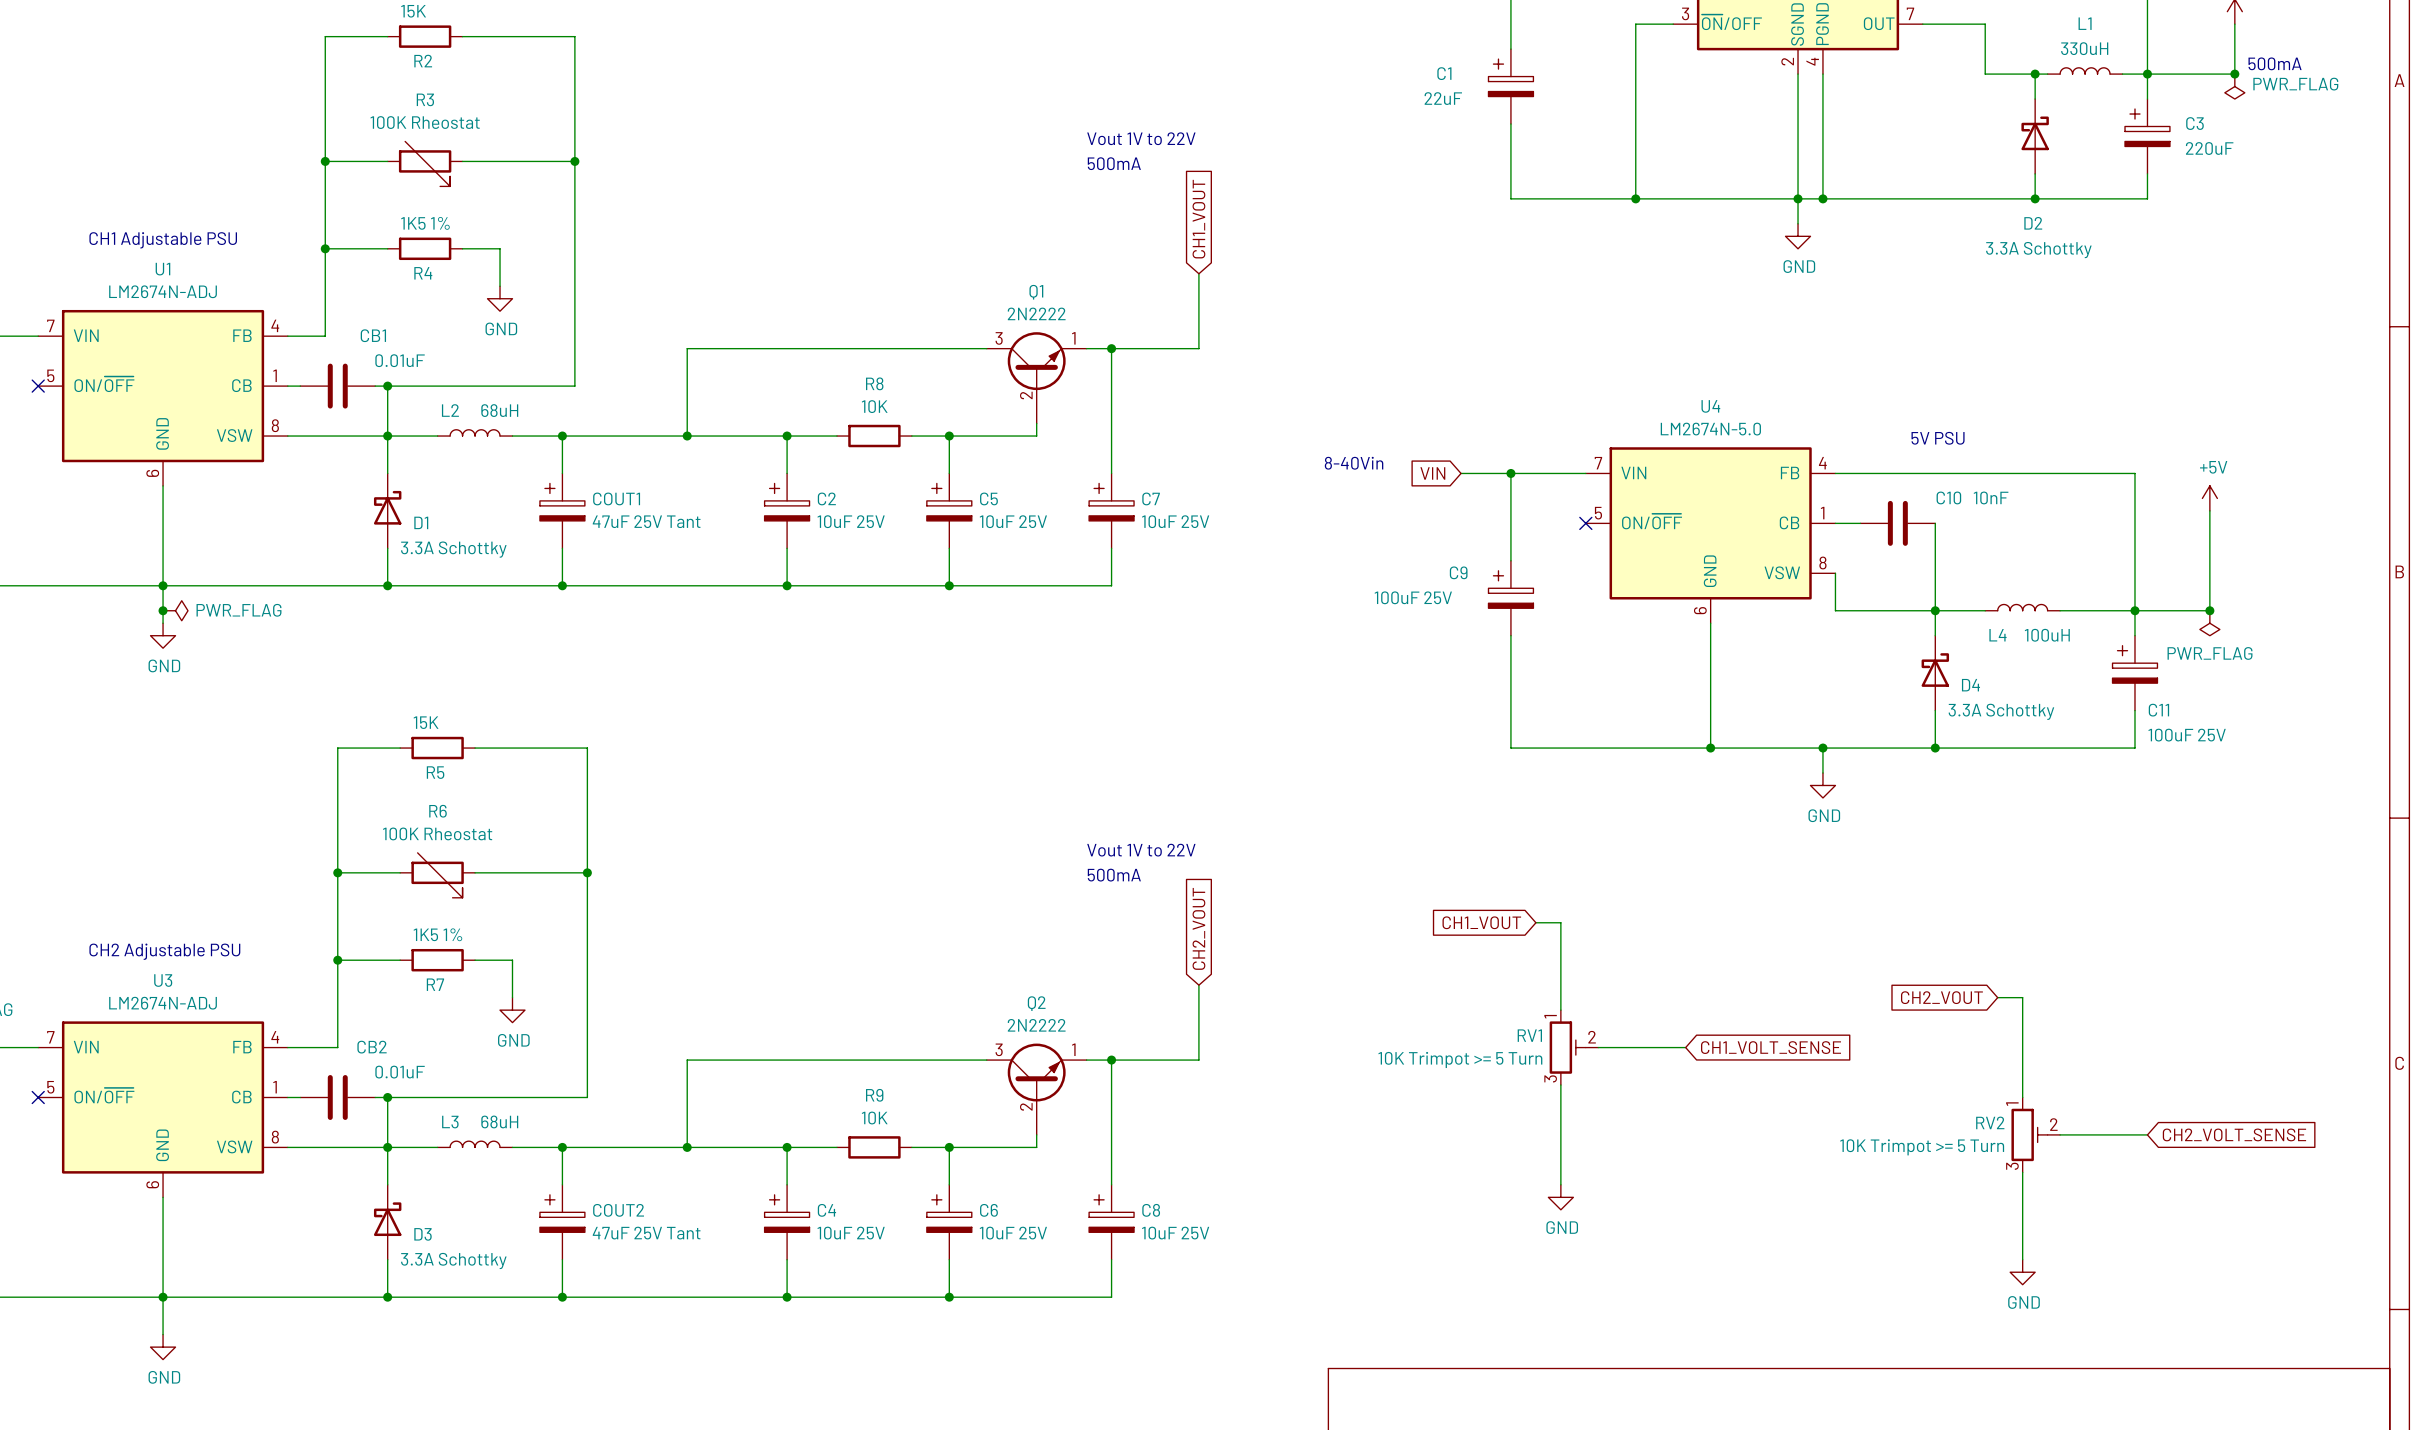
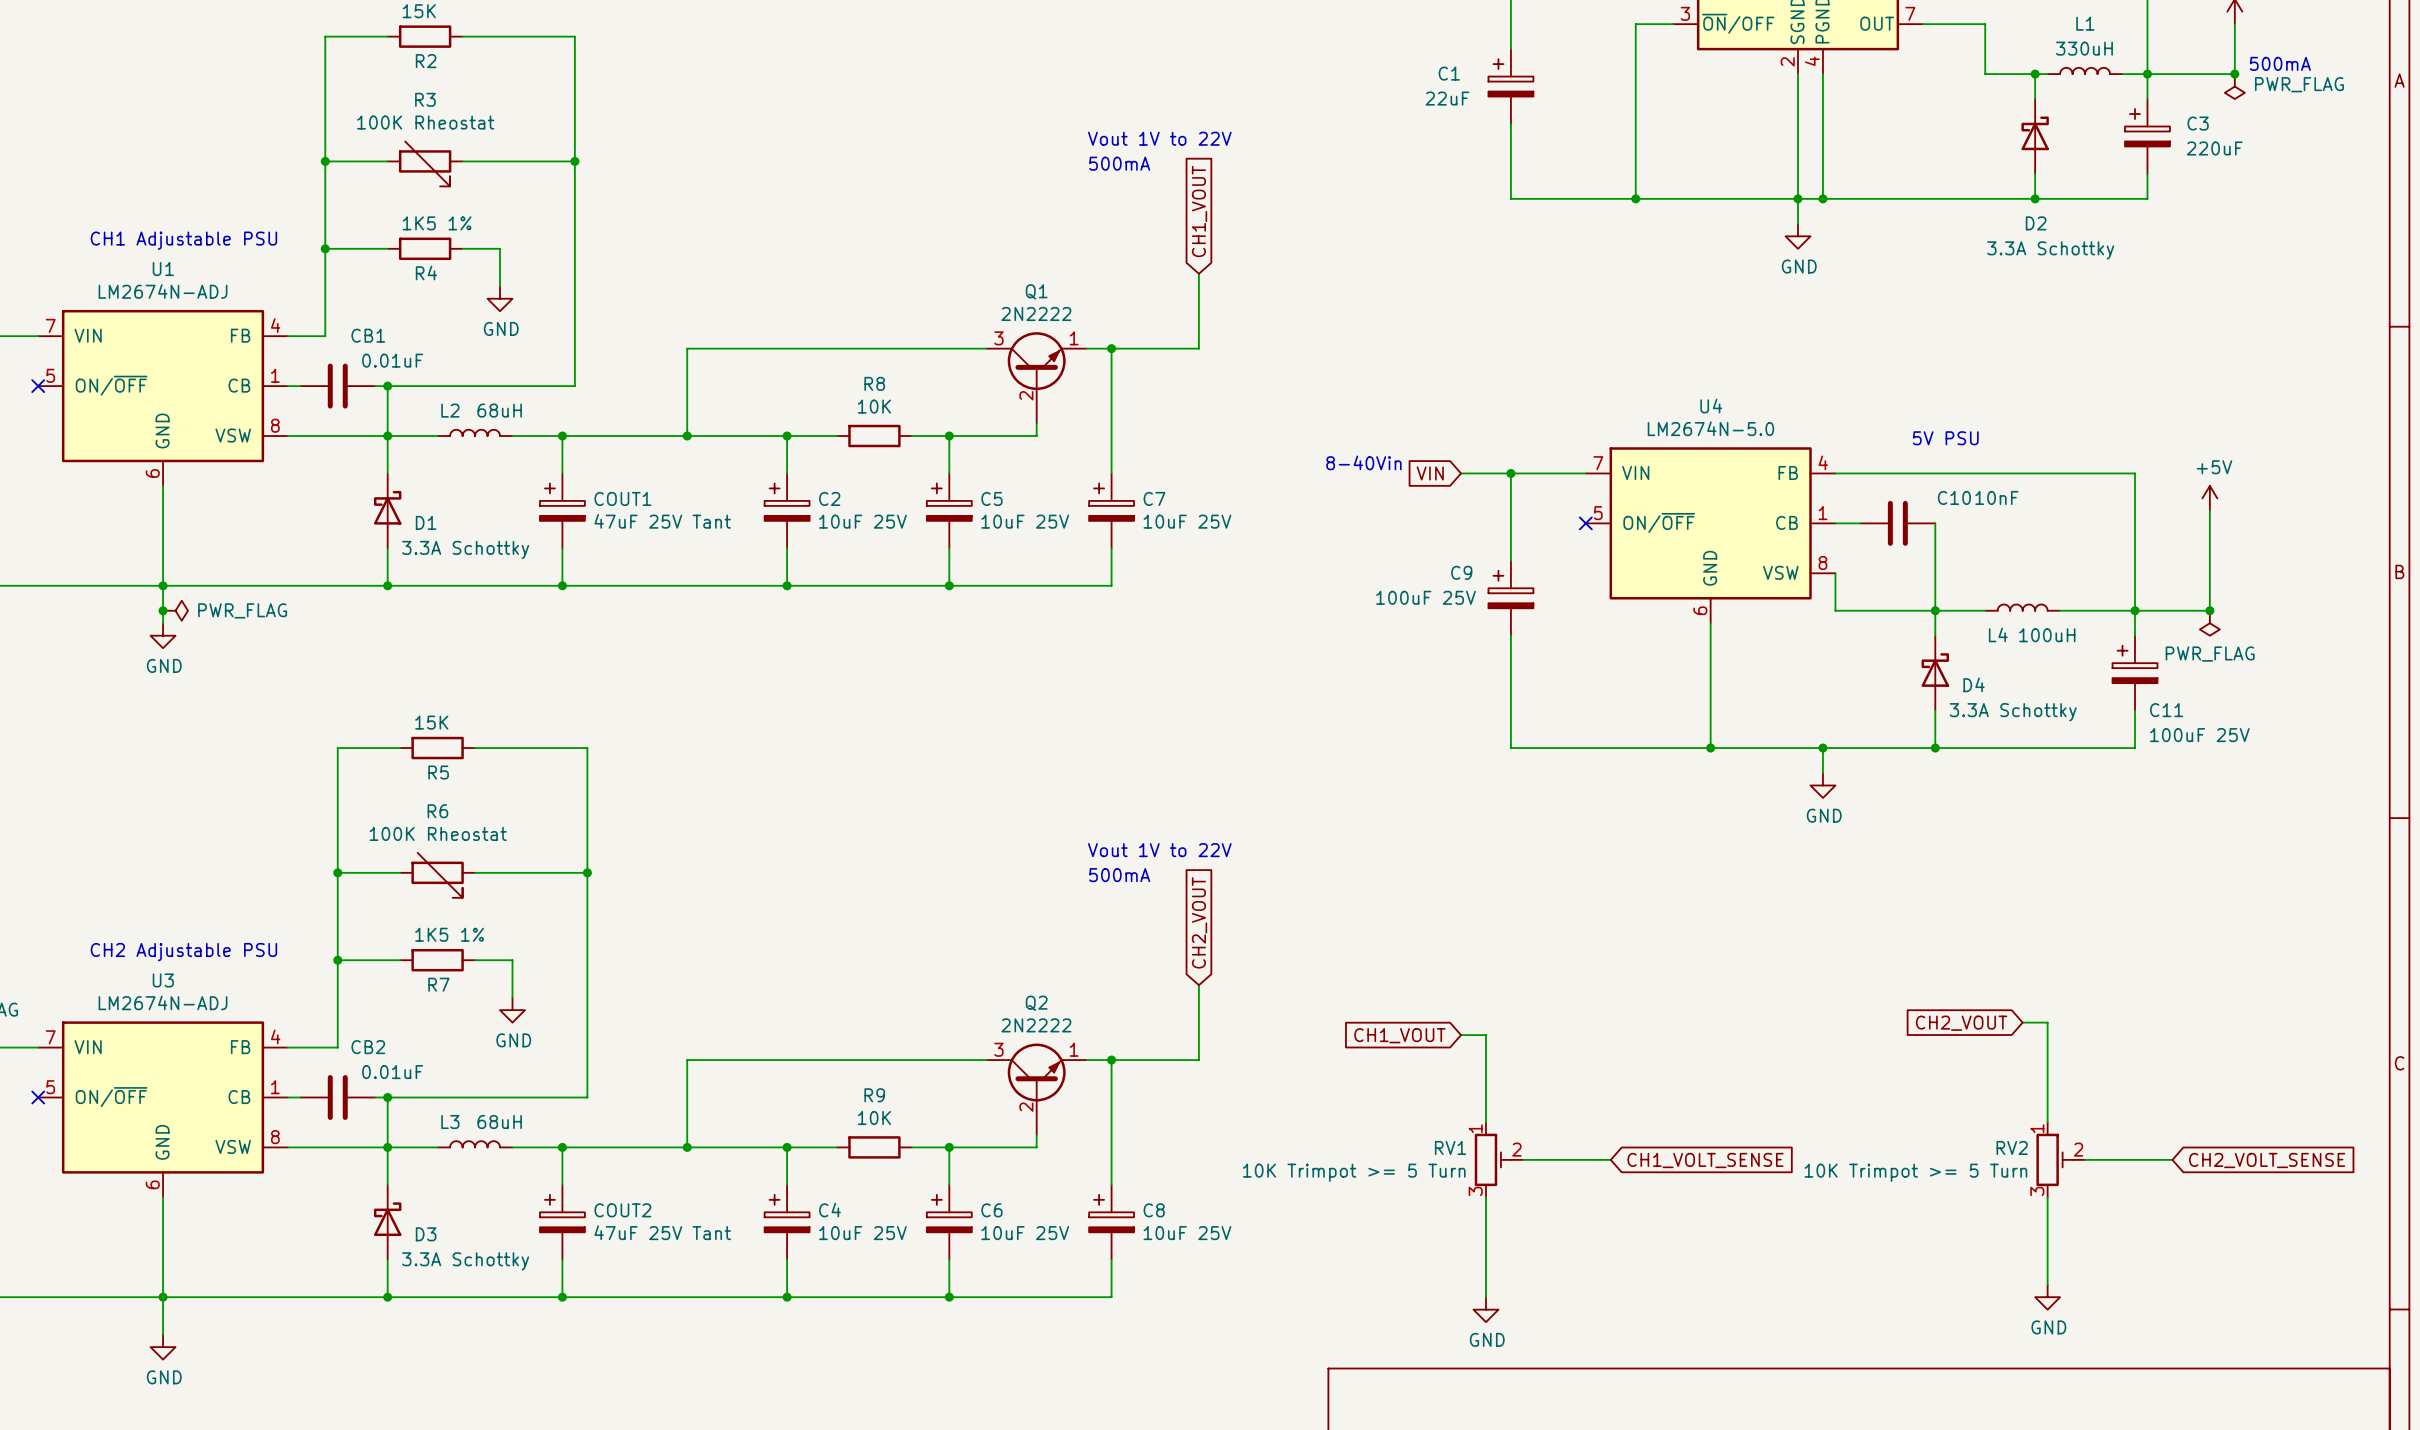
global label position: CH1_VOUT (1481, 922) -> CH1_VOUT (1399, 1035)
wire: (1535, 922) (1560, 922) (1560, 1010) -> (1461, 1035) (1485, 1035) (1485, 1122)
global label position: CH2_VOUT (1941, 997) -> CH2_VOUT (1961, 1023)
wire: (1997, 997) (2022, 997) (2022, 1097) -> (2022, 1022) (2047, 1022) (2047, 1122)
RV1 position: (1573, 1047) -> (1499, 1159)
wire: (1598, 1047) (1685, 1047) -> (1523, 1159) (1610, 1159)
global label position: CH1_VOLT_SENSE (1771, 1047) -> CH1_VOLT_SENSE (1705, 1160)
wire: (1560, 1085) (1560, 1184) -> (1485, 1197) (1485, 1297)
RV2 position: (2035, 1134) -> (2060, 1159)
wire: (2060, 1134) (2147, 1134) -> (2085, 1159) (2172, 1159)
global label position: CH2_VOLT_SENSE (2234, 1134) -> CH2_VOLT_SENSE (2267, 1160)
wire: (2022, 1172) (2022, 1259) -> (2047, 1197) (2047, 1284)
power symbol position: GND (1560, 1197) -> GND (1485, 1309)
power symbol position: GND (2022, 1272) -> GND (2047, 1297)

